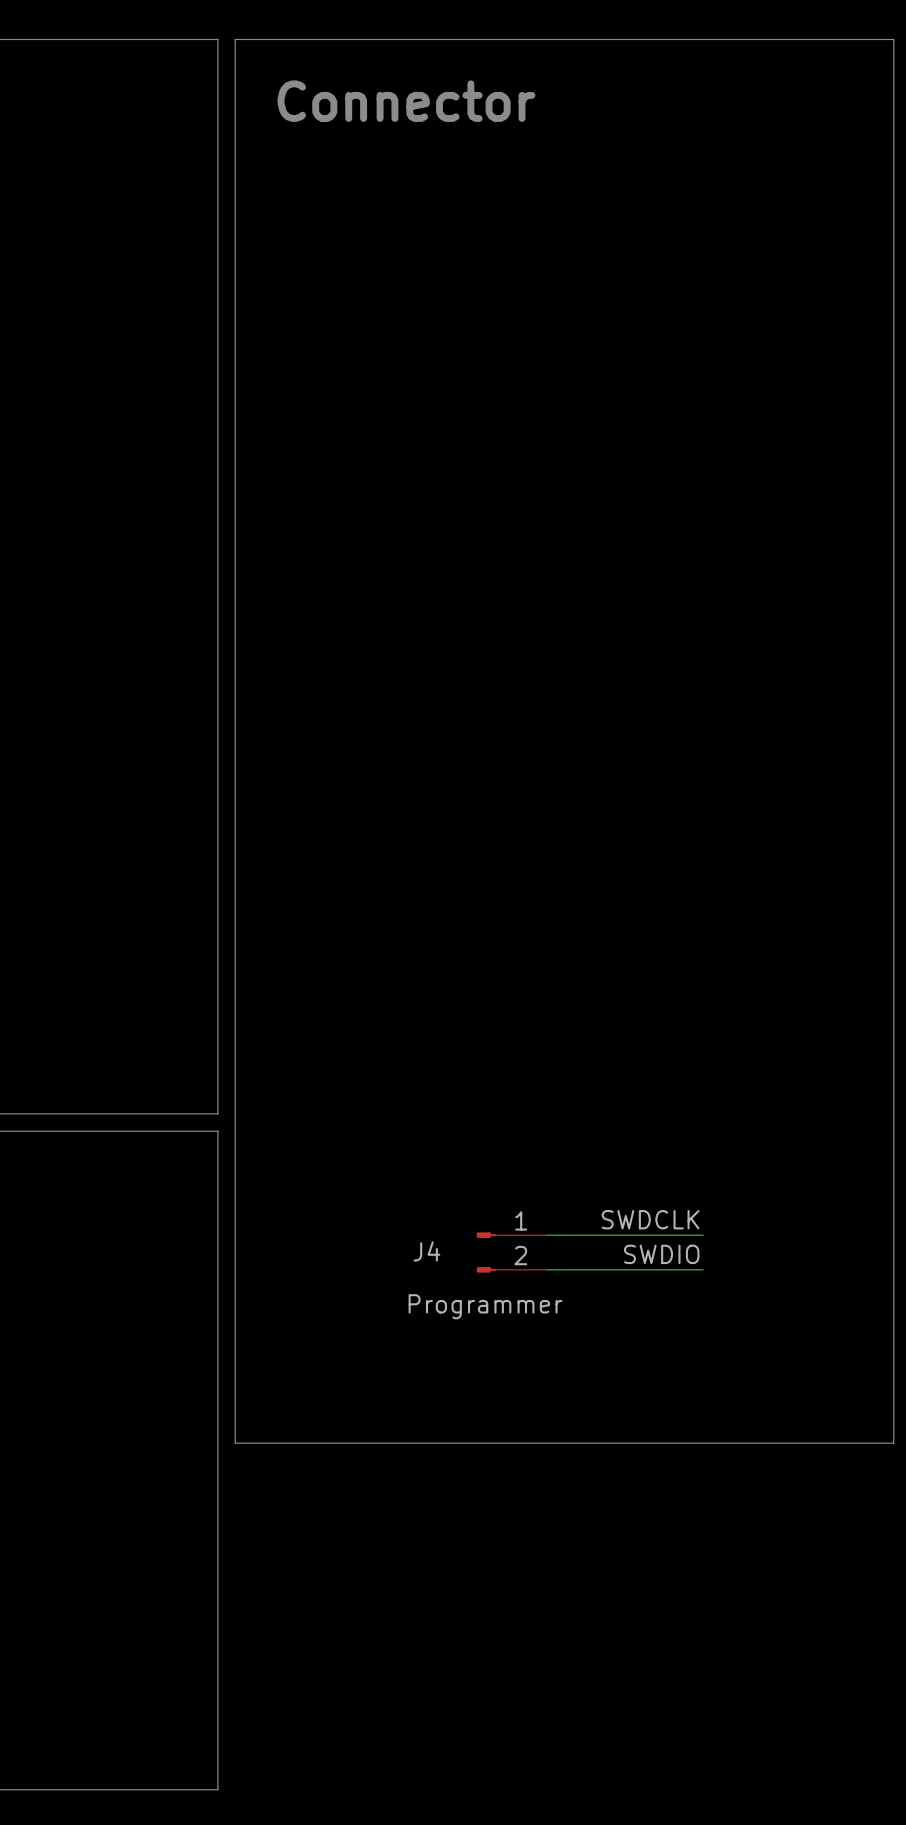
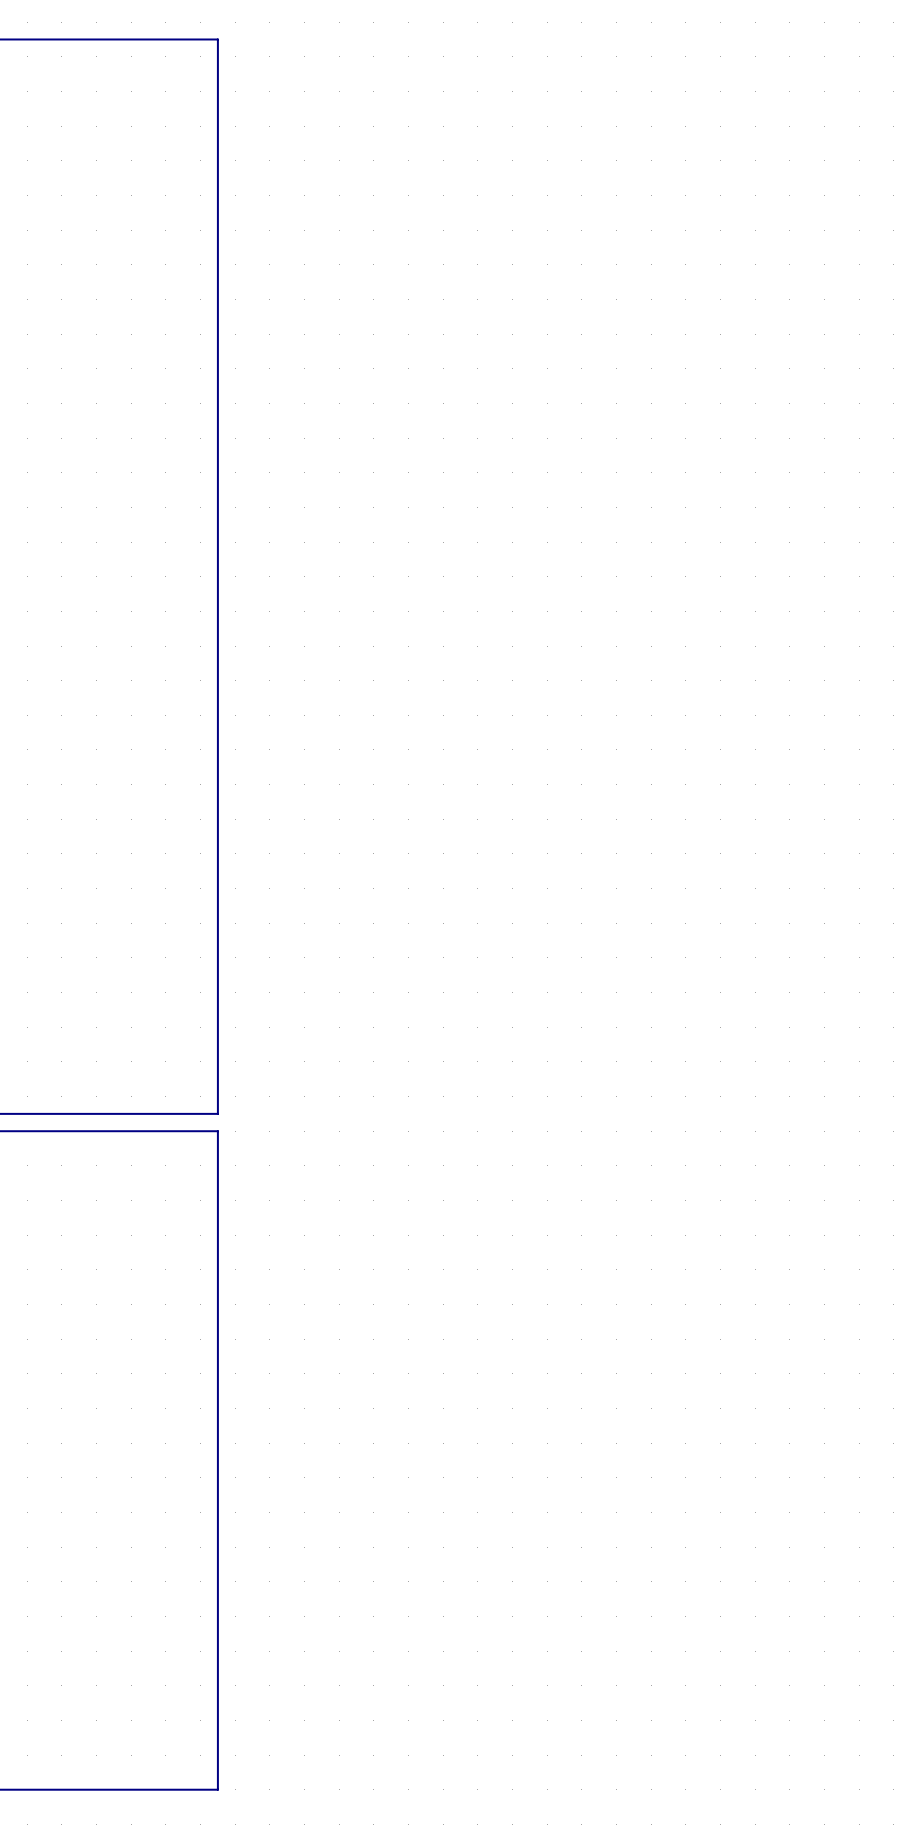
line: (235, 39) (893, 39) (893, 1443) (235, 1443) (235, 39) -> none
text: Connector (406, 101) -> none
label: SWDCLK (650, 1219) -> none
wire: (547, 1235) (703, 1235) -> none
J4: Programmer (511, 1252) -> none
label: SWDIO (661, 1254) -> none
wire: (547, 1269) (703, 1269) -> none

